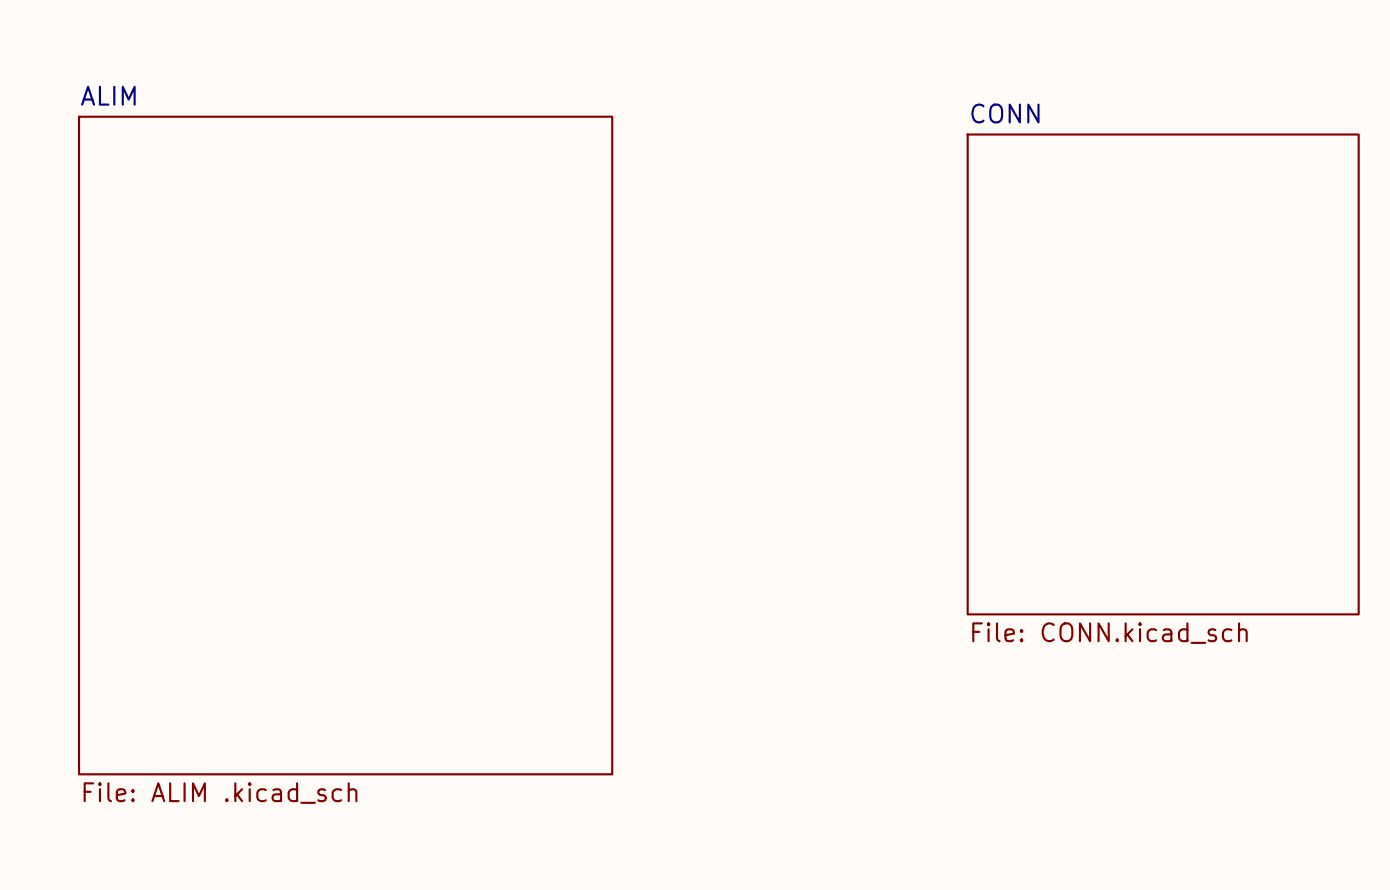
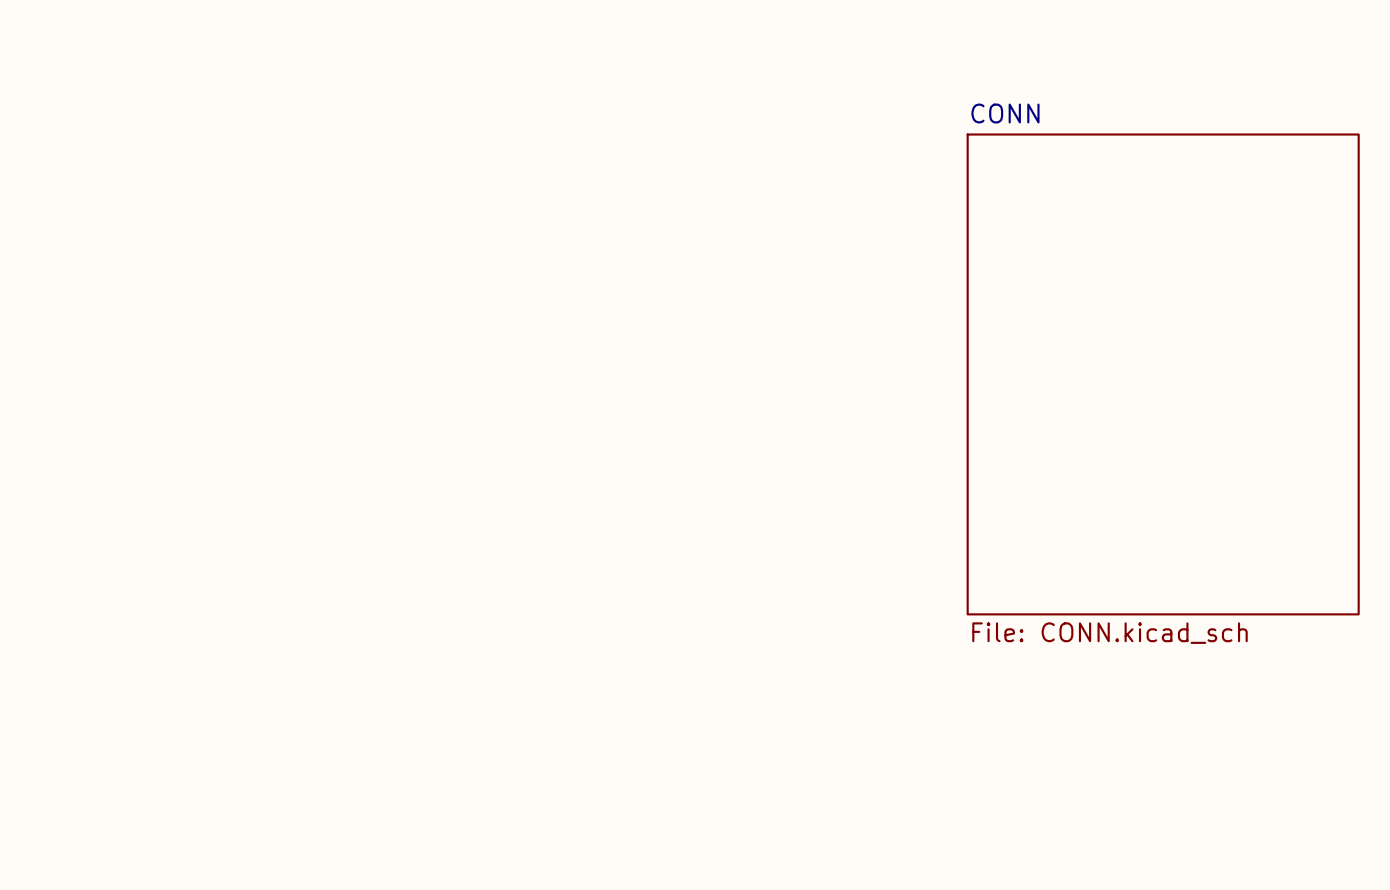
sheet ALIM: File: ALIM .kicad_sch (345, 445) -> none

